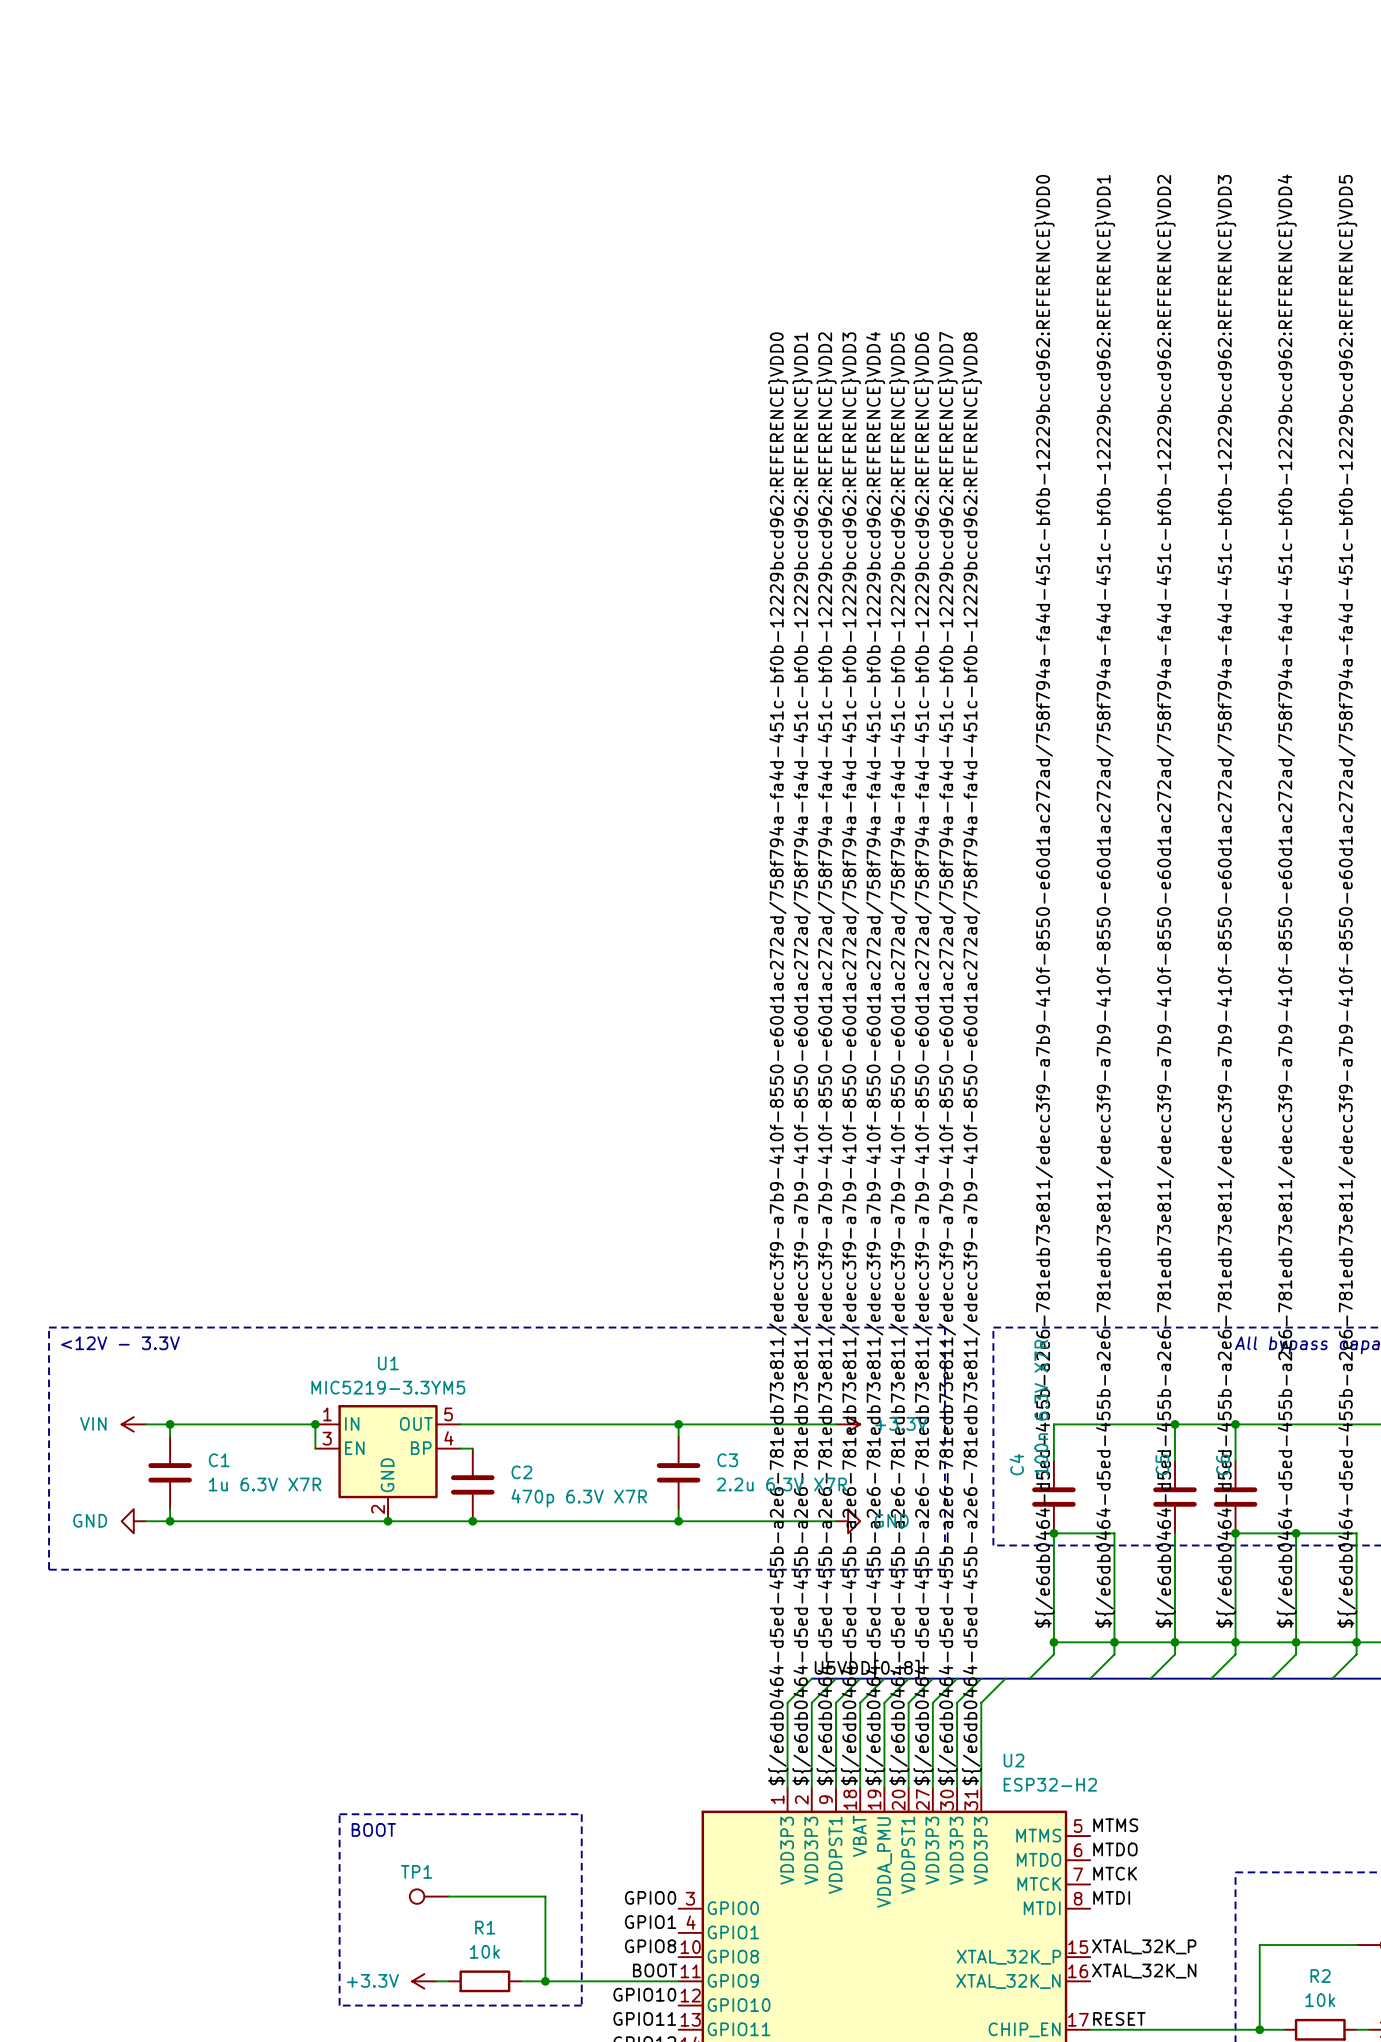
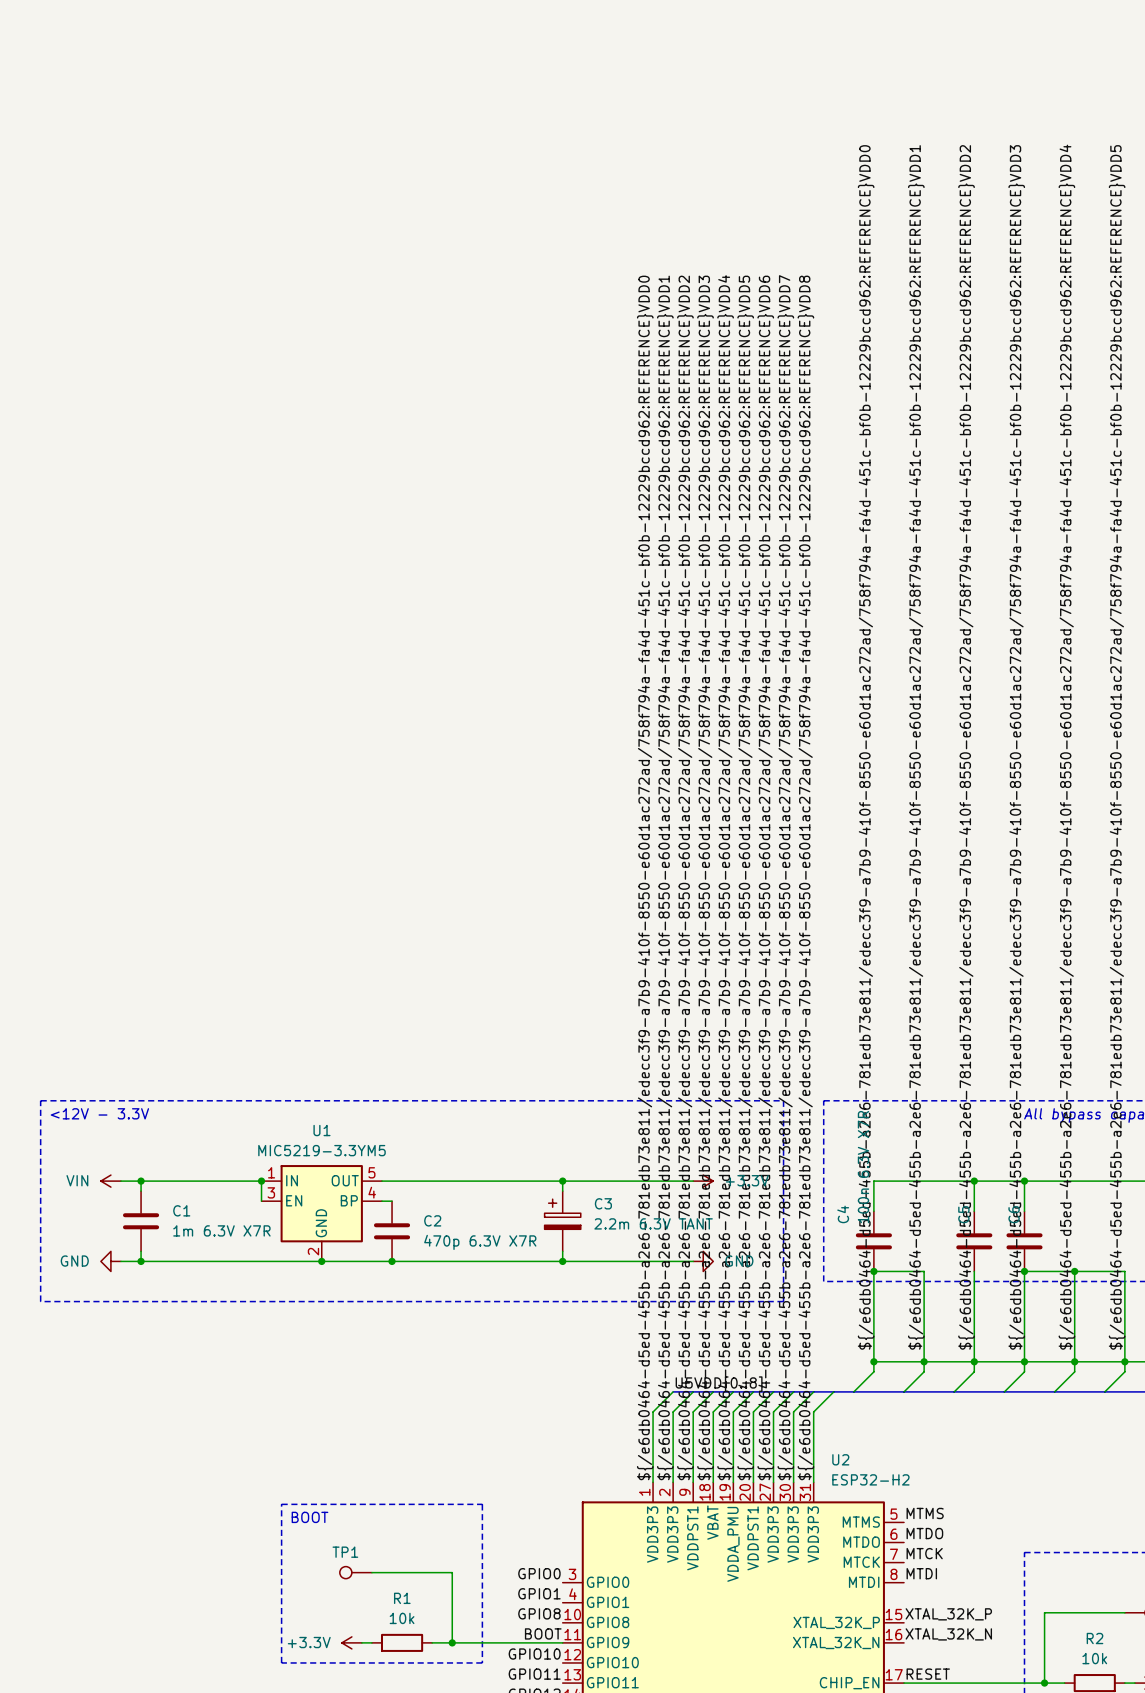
C3 symbol: [656, 1436, 701, 1510] -> [544, 1191, 581, 1252]
C1 value: 1u 6.3V X7R (265, 1484) -> 1m 6.3V X7R (221, 1230)
C3 value: 2.2u 6.3V X7R (781, 1484) -> 2.2m 6.3V TANT (653, 1223)

